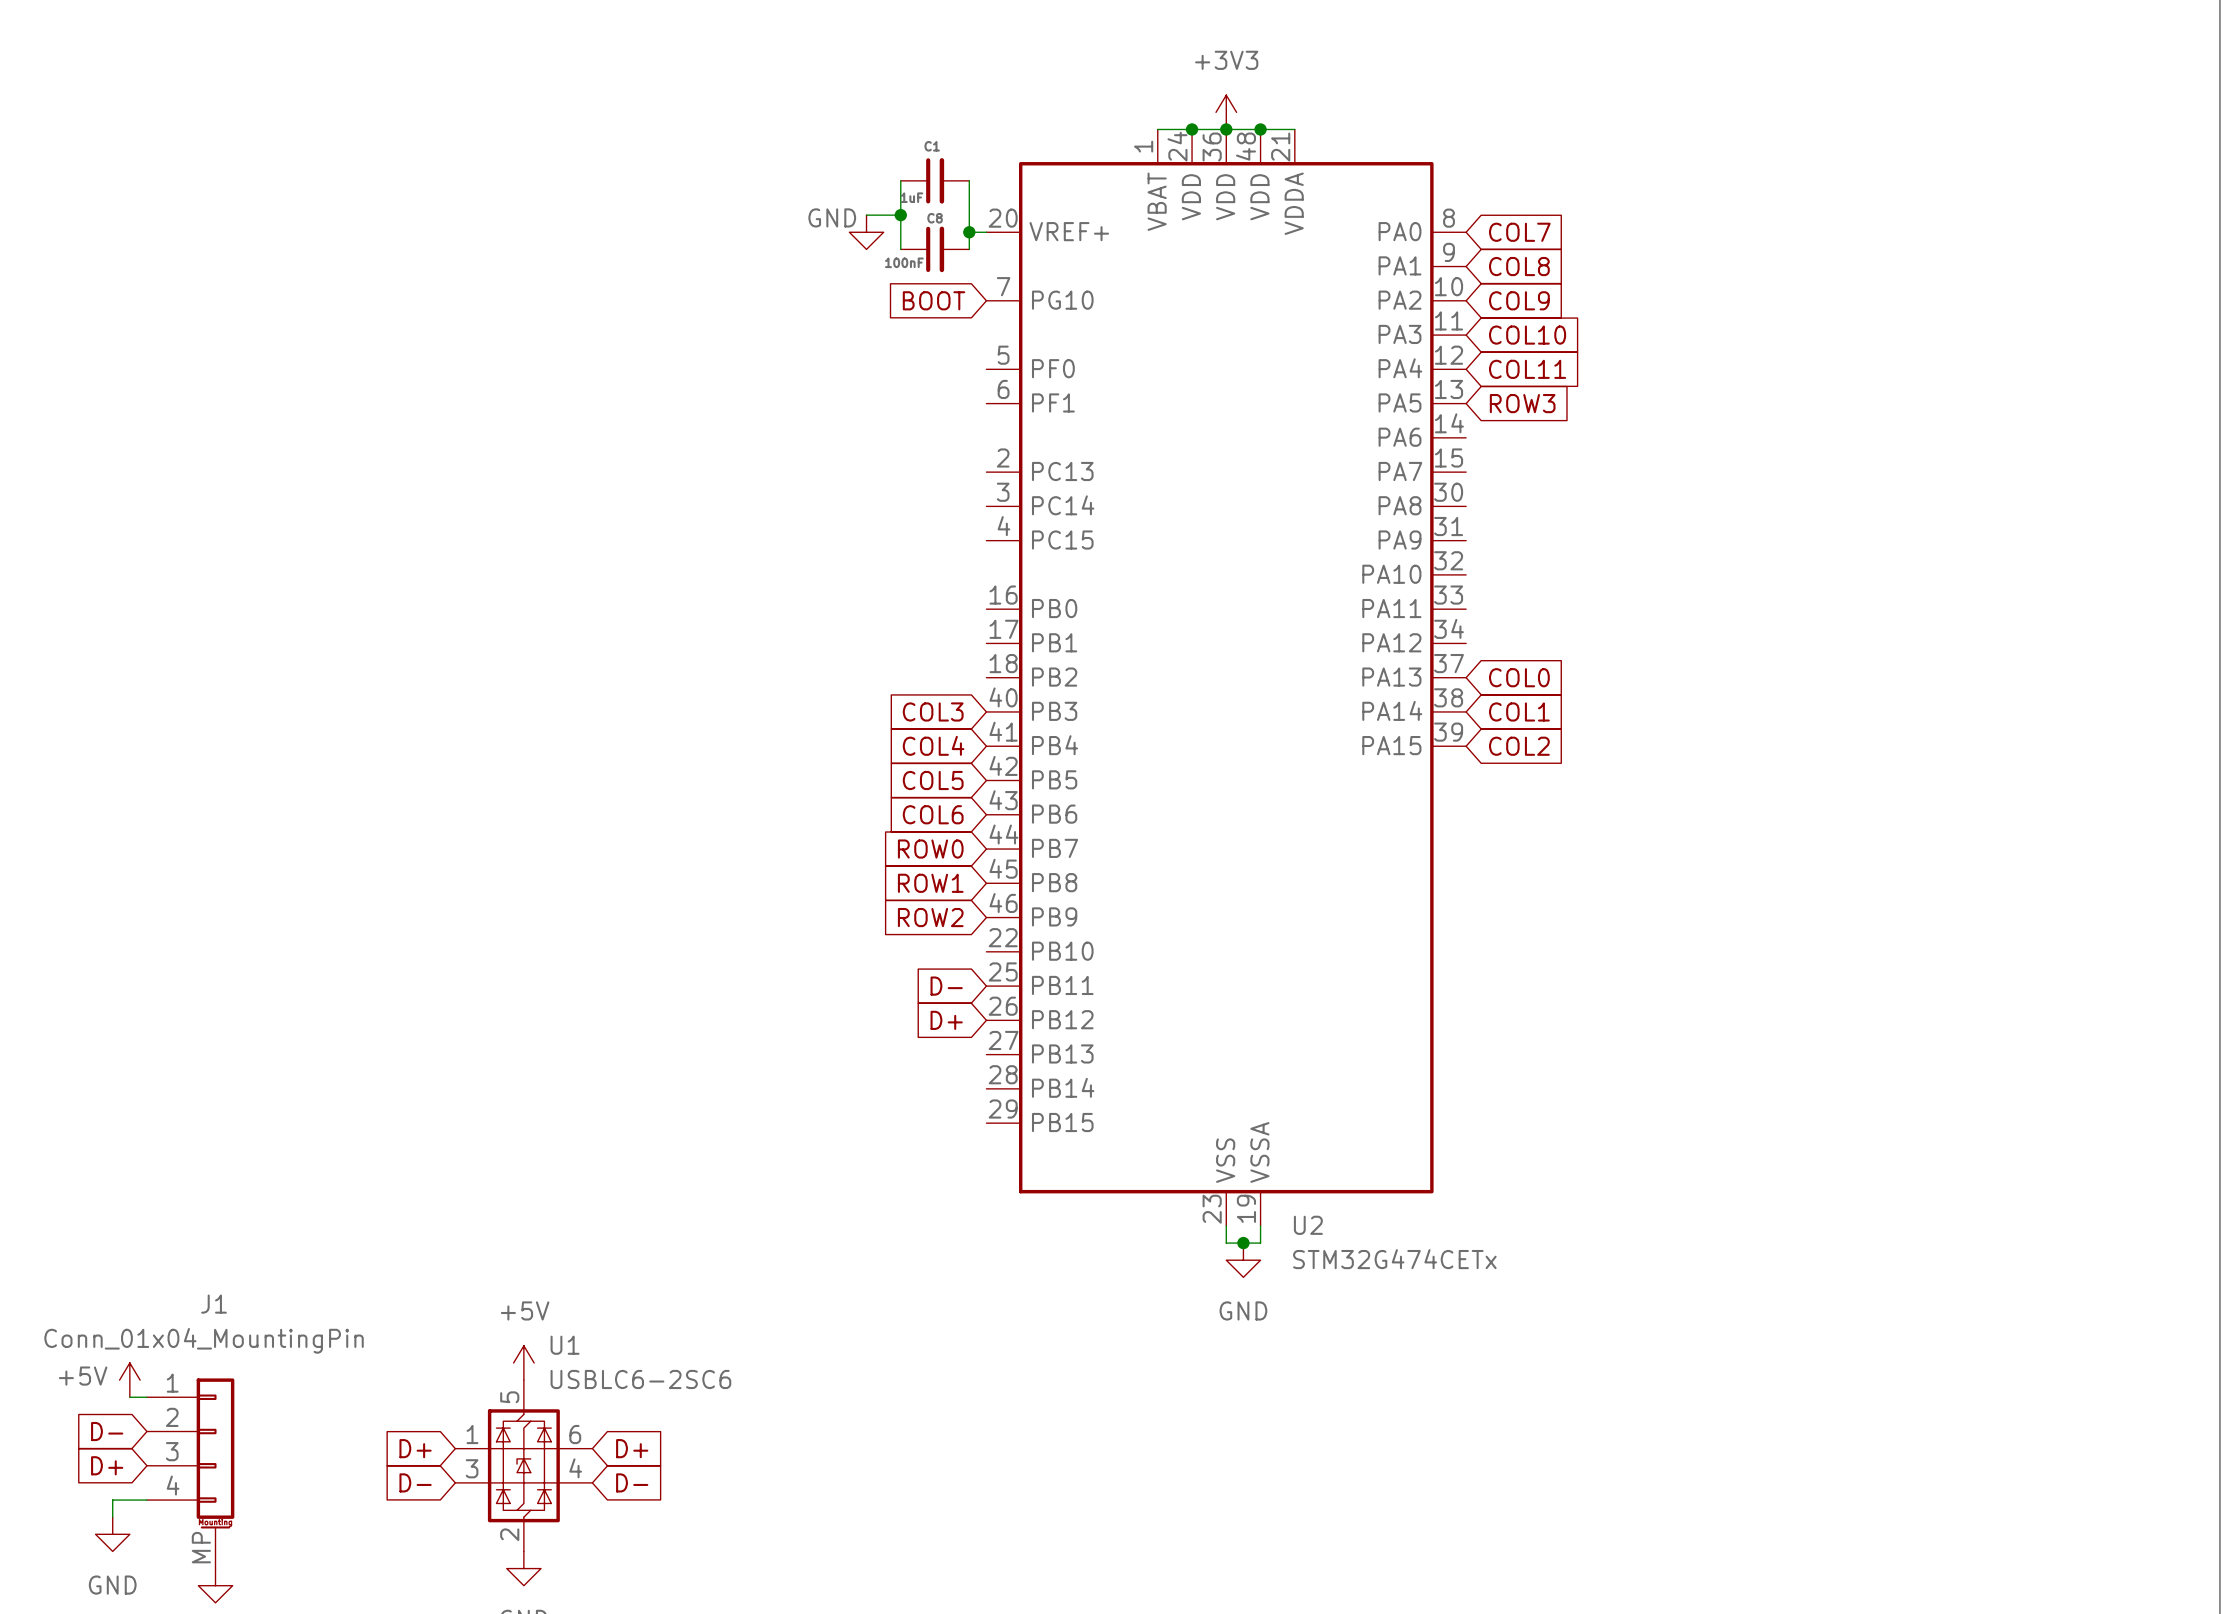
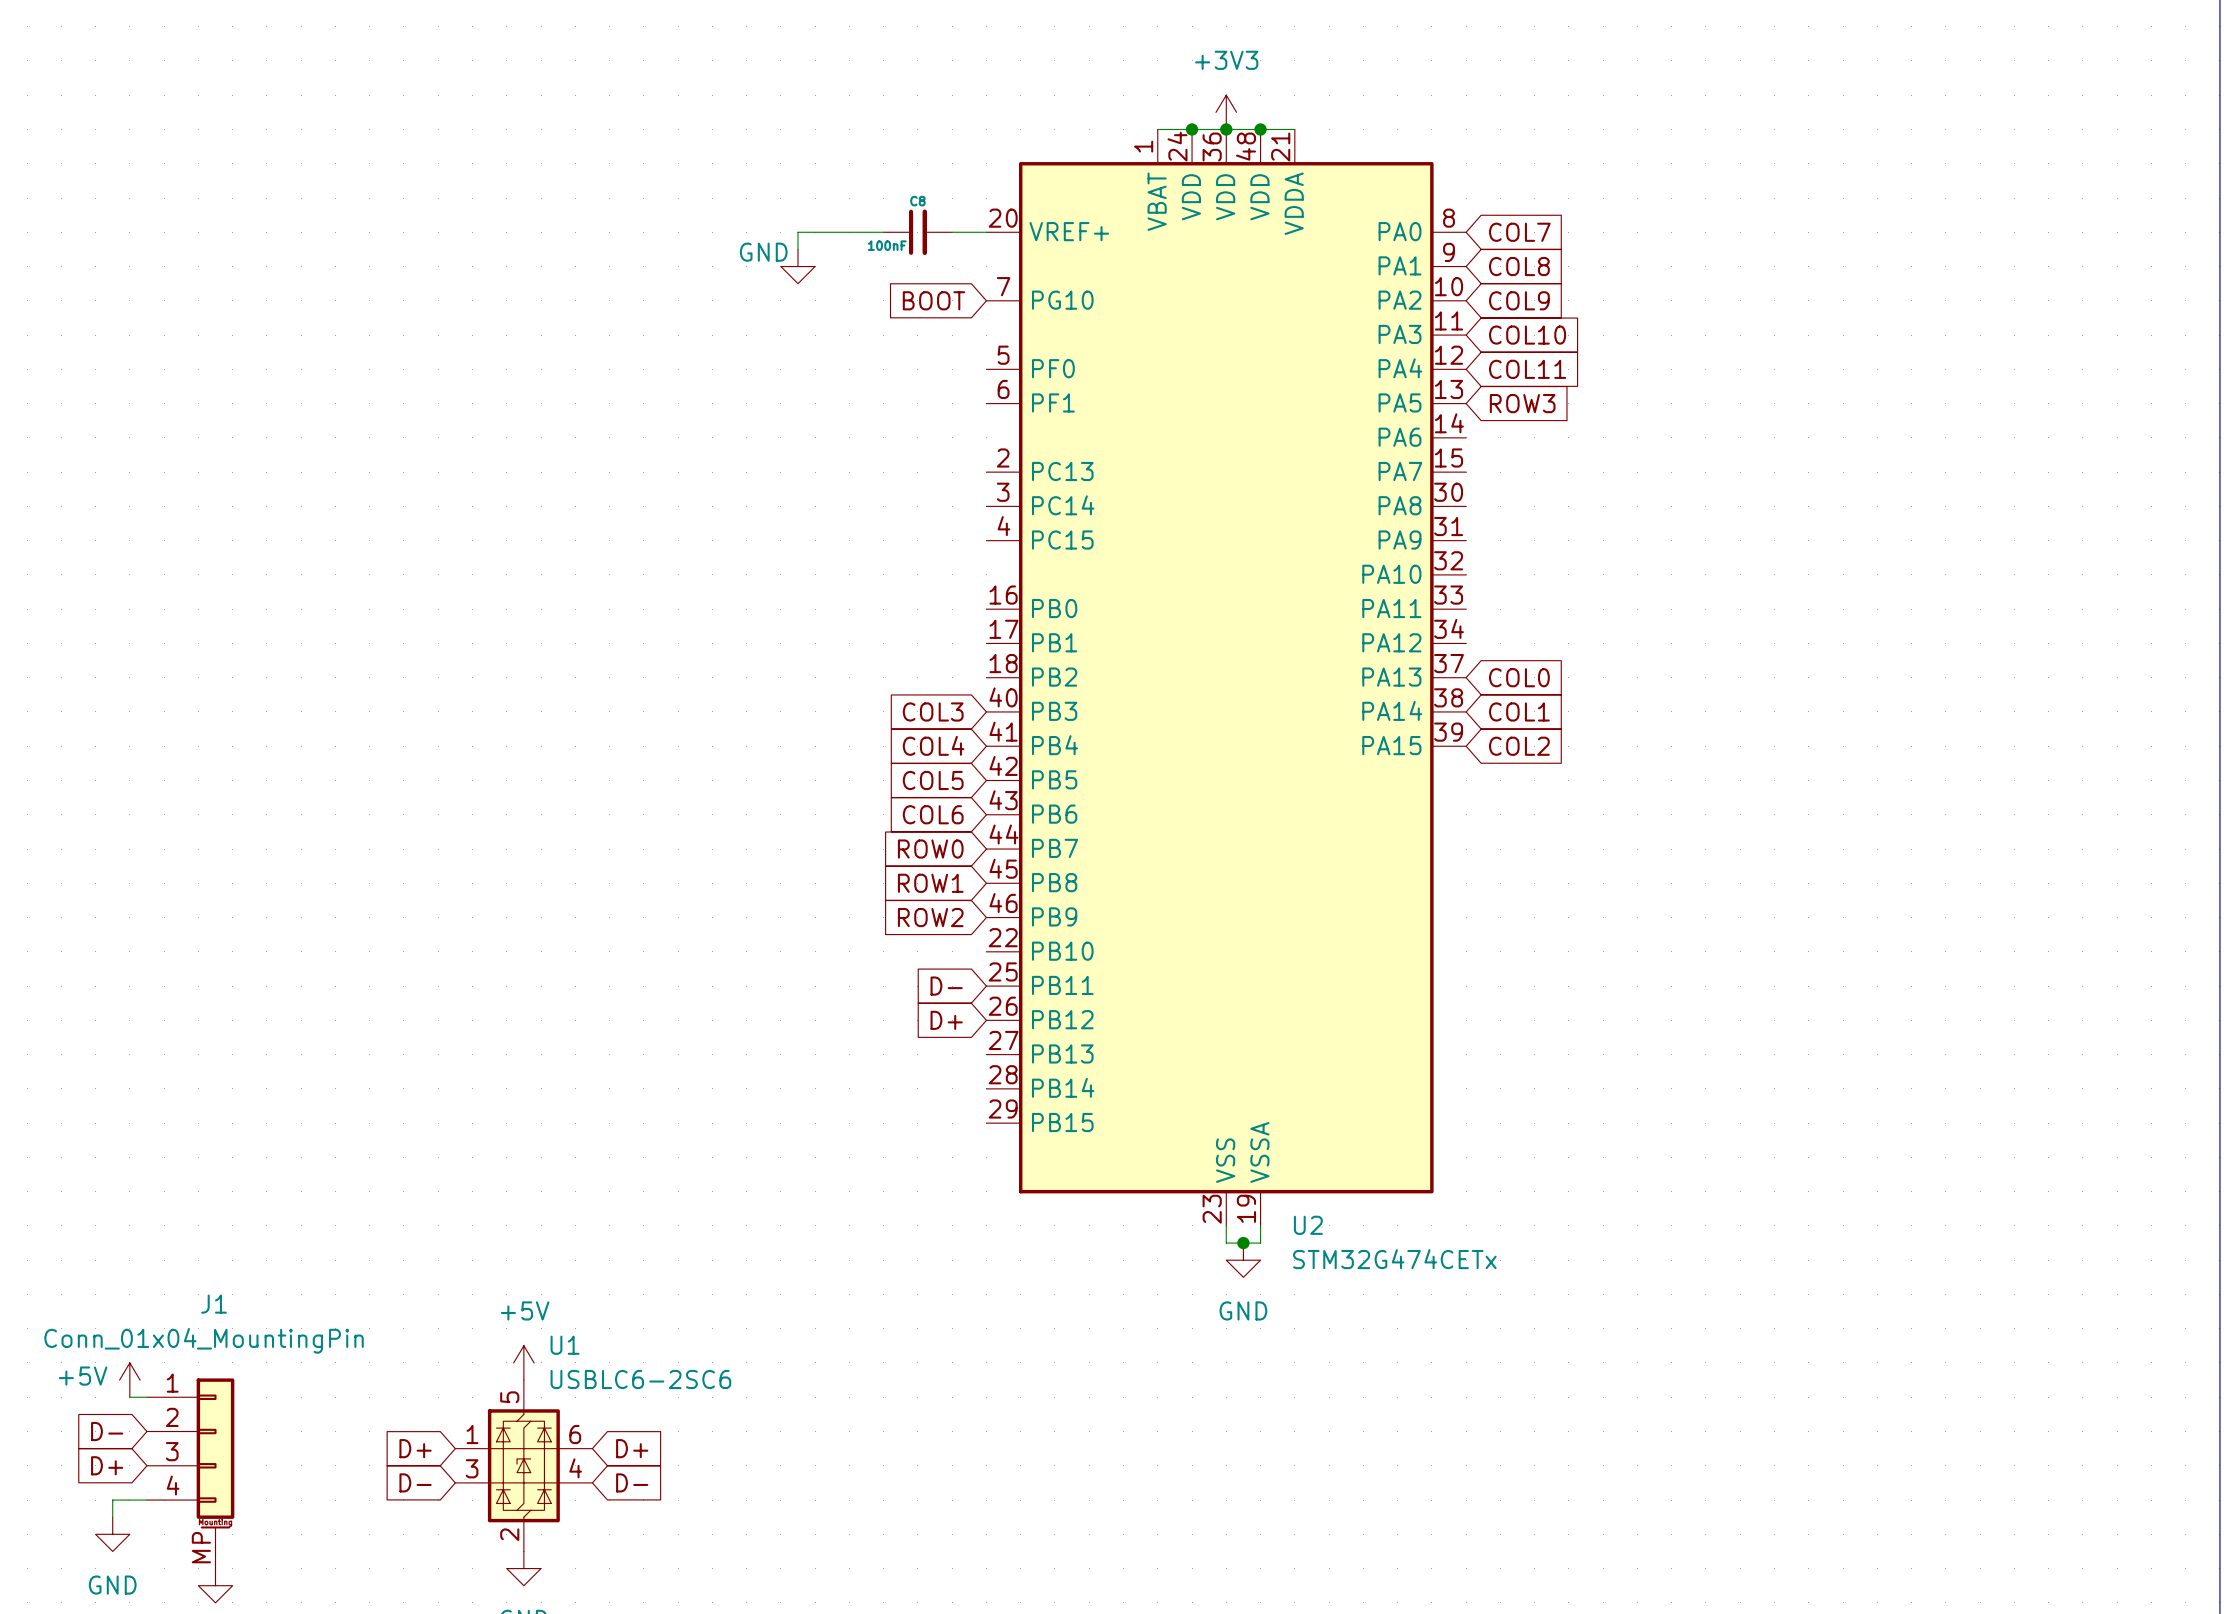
wire: (900, 180) (900, 249) -> none
C1: 1uF (935, 180) -> none
wire: (969, 180) (969, 249) -> none
wire: (866, 215) (900, 215) -> none
junction: (900, 215) -> none
power symbol position: GND (866, 232) -> GND (797, 266)
wire: none -> (883, 232) (797, 232) (797, 249)
wire: none -> (952, 232) (969, 232)
junction: (969, 232) -> none
C8 position: (935, 249) -> (917, 232)

